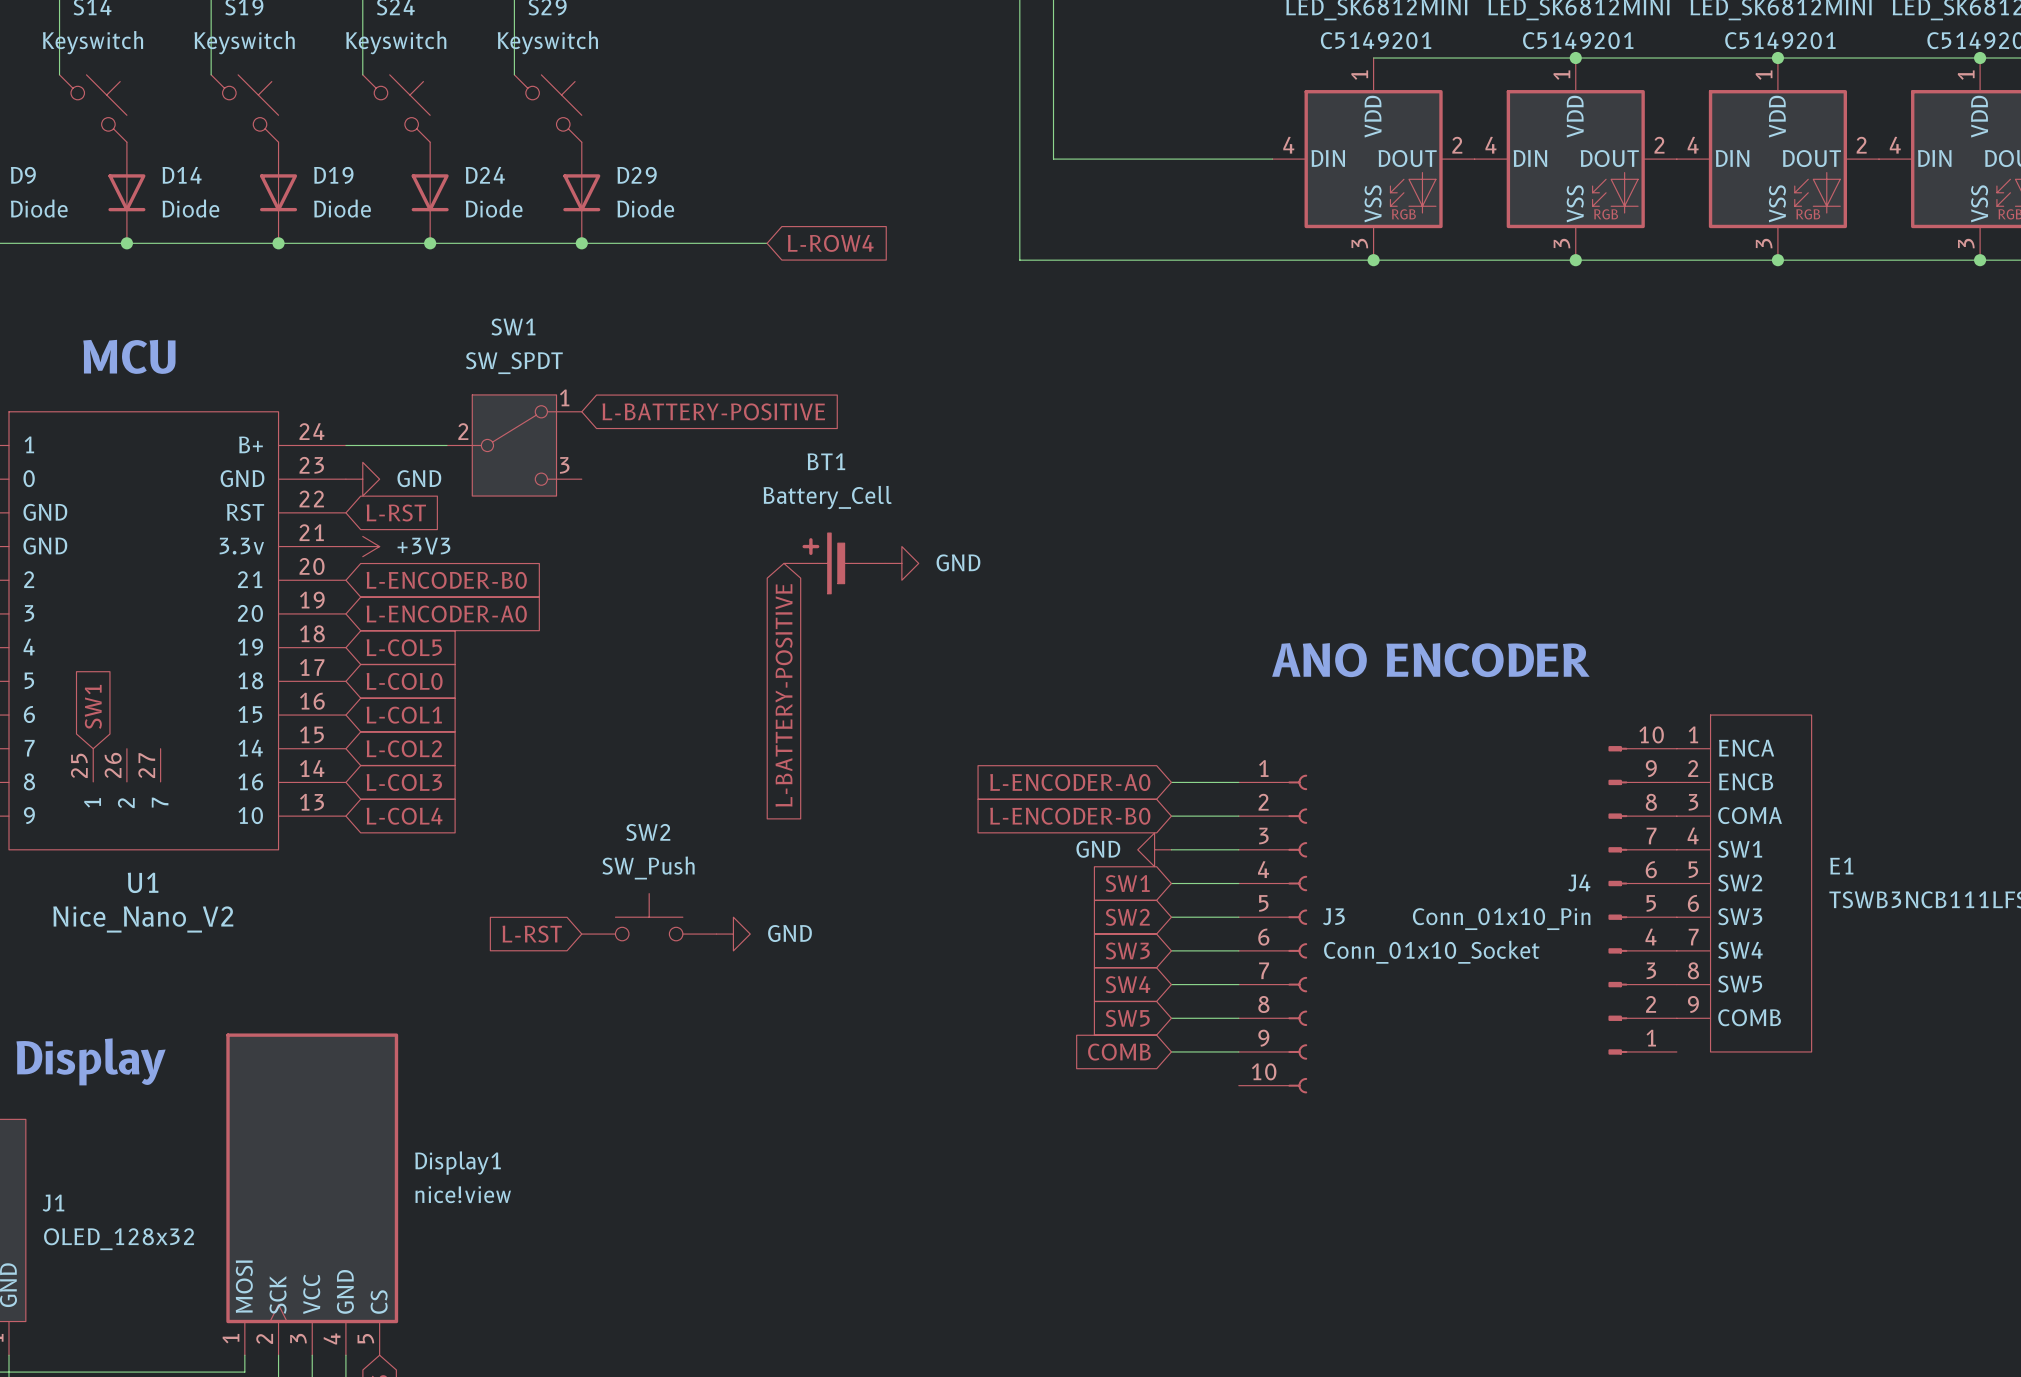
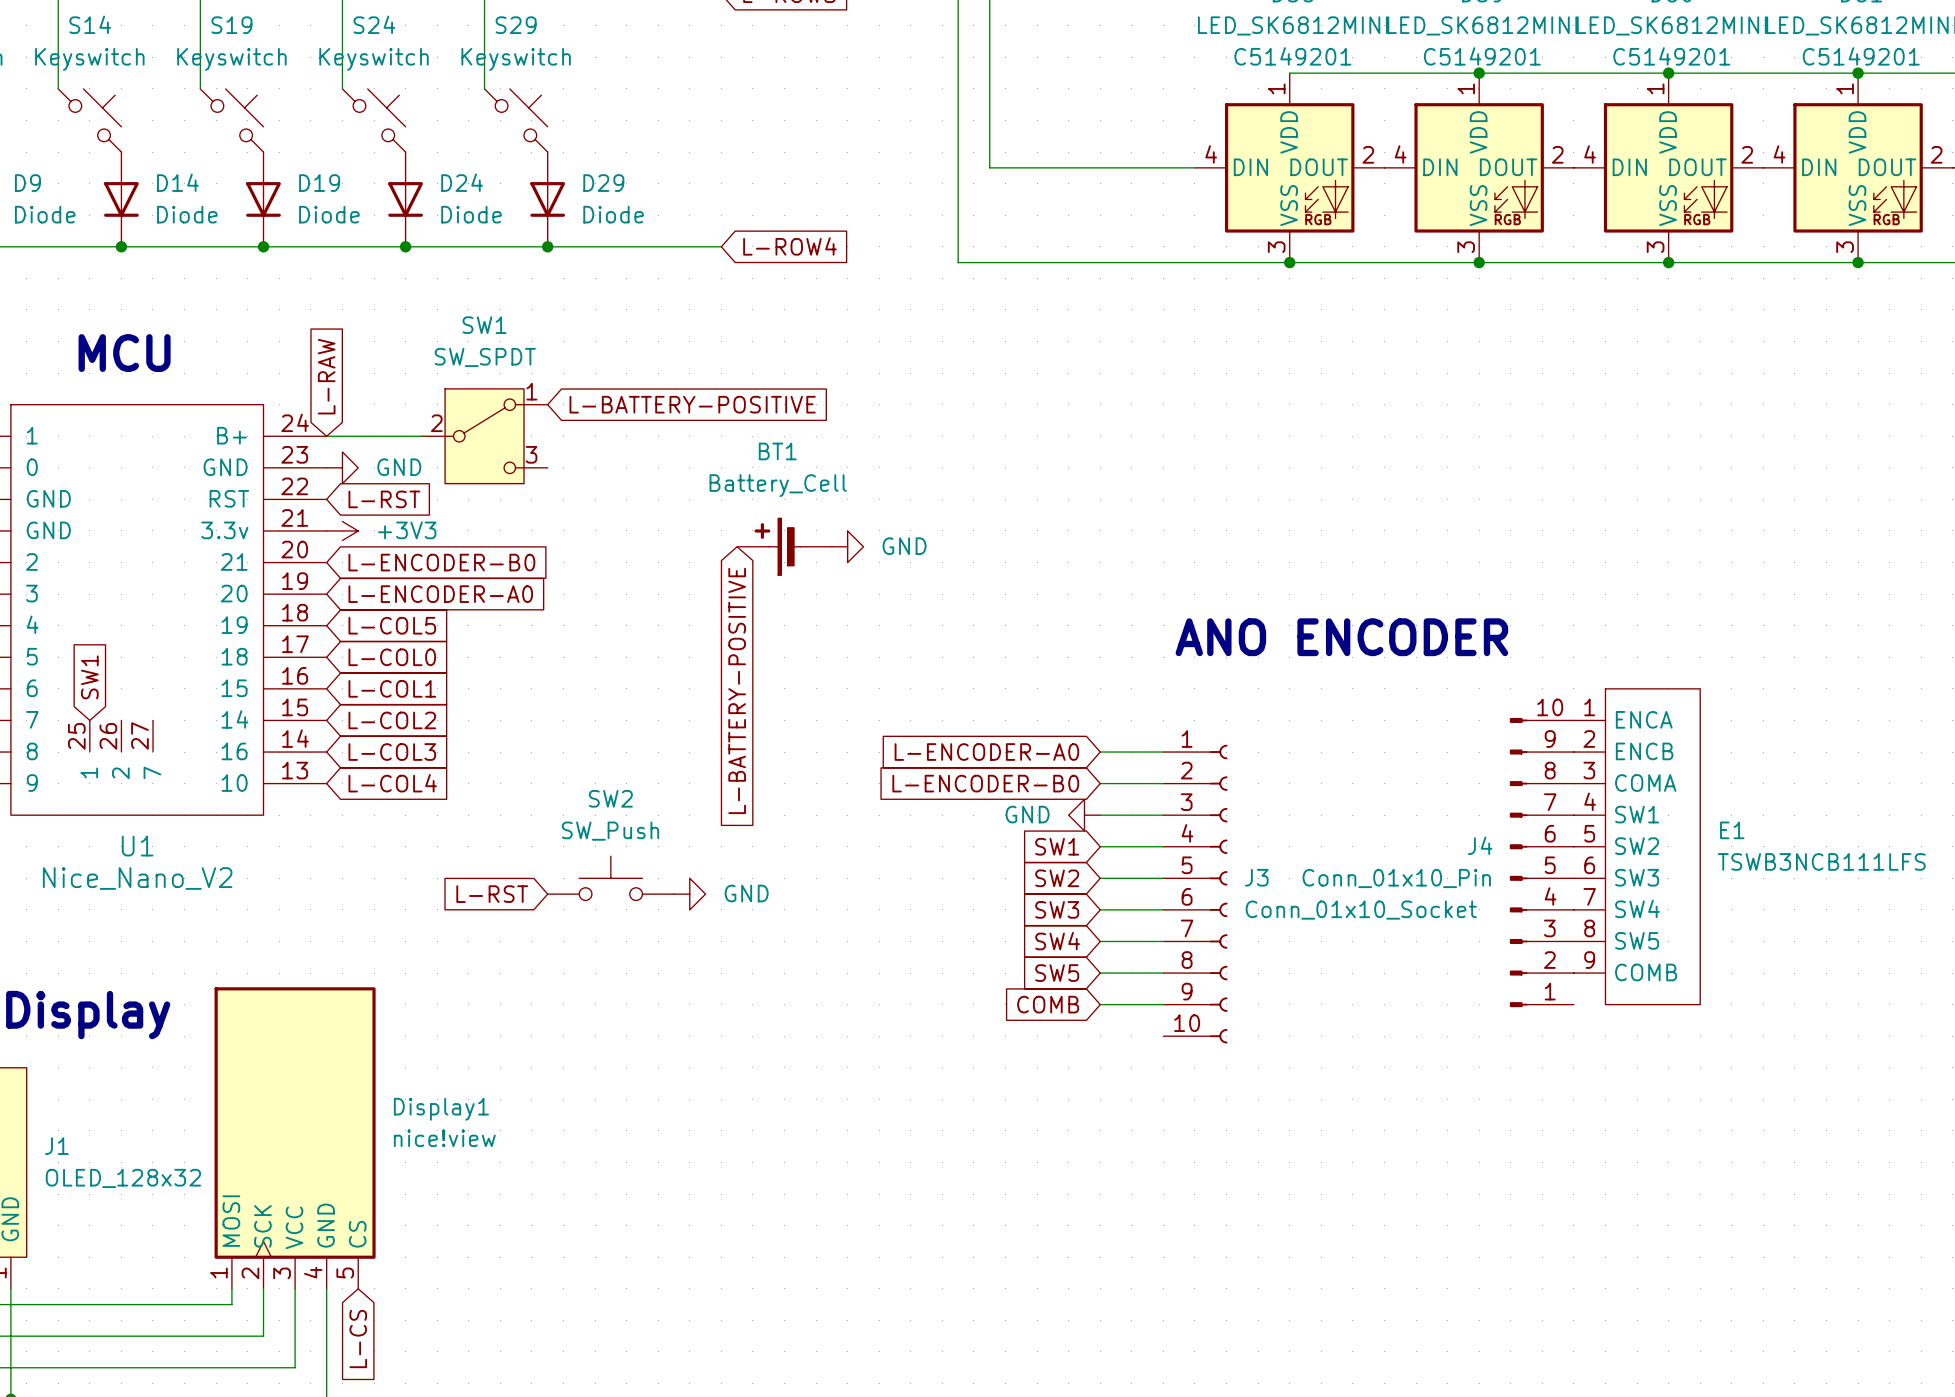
global label: none -> L-RAW (326, 376)

